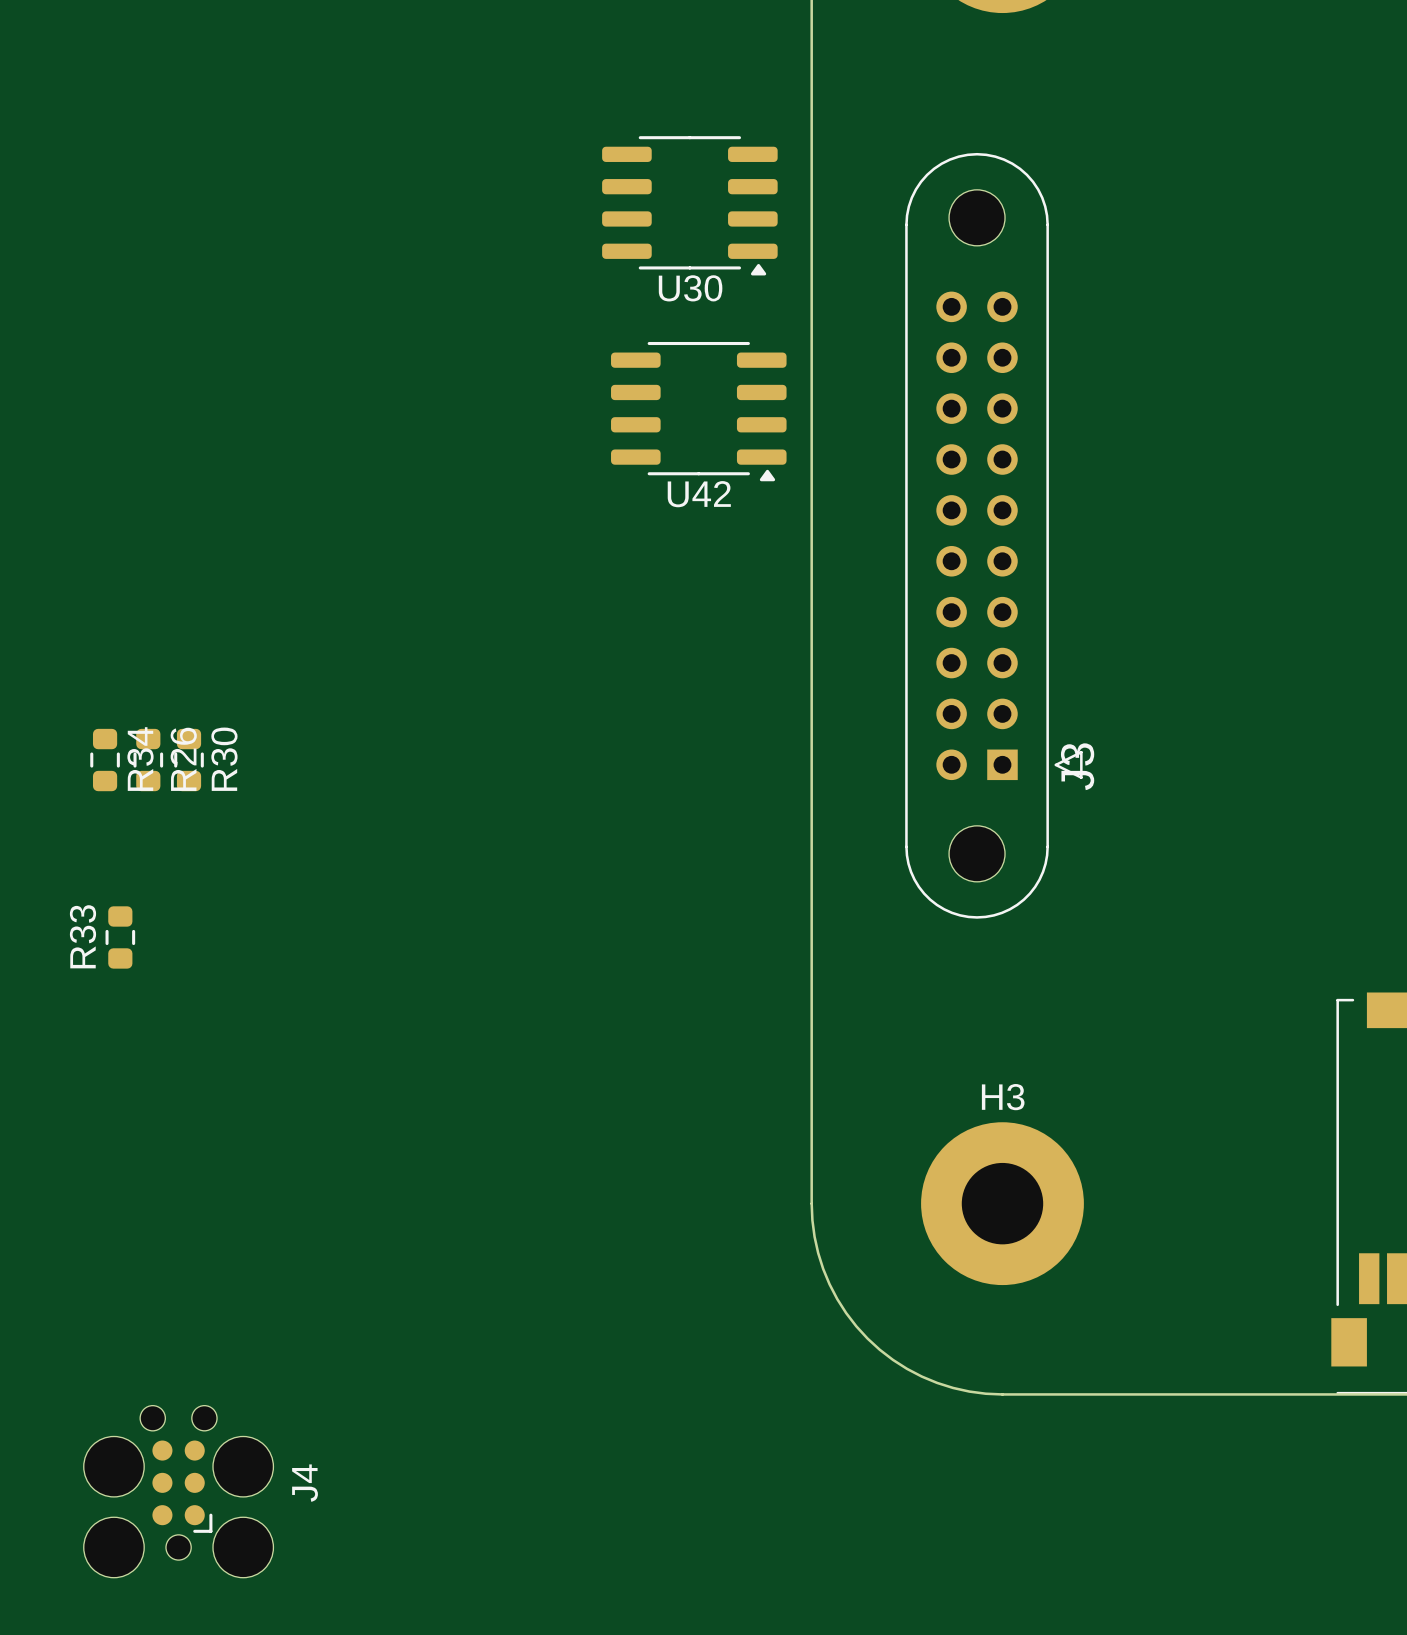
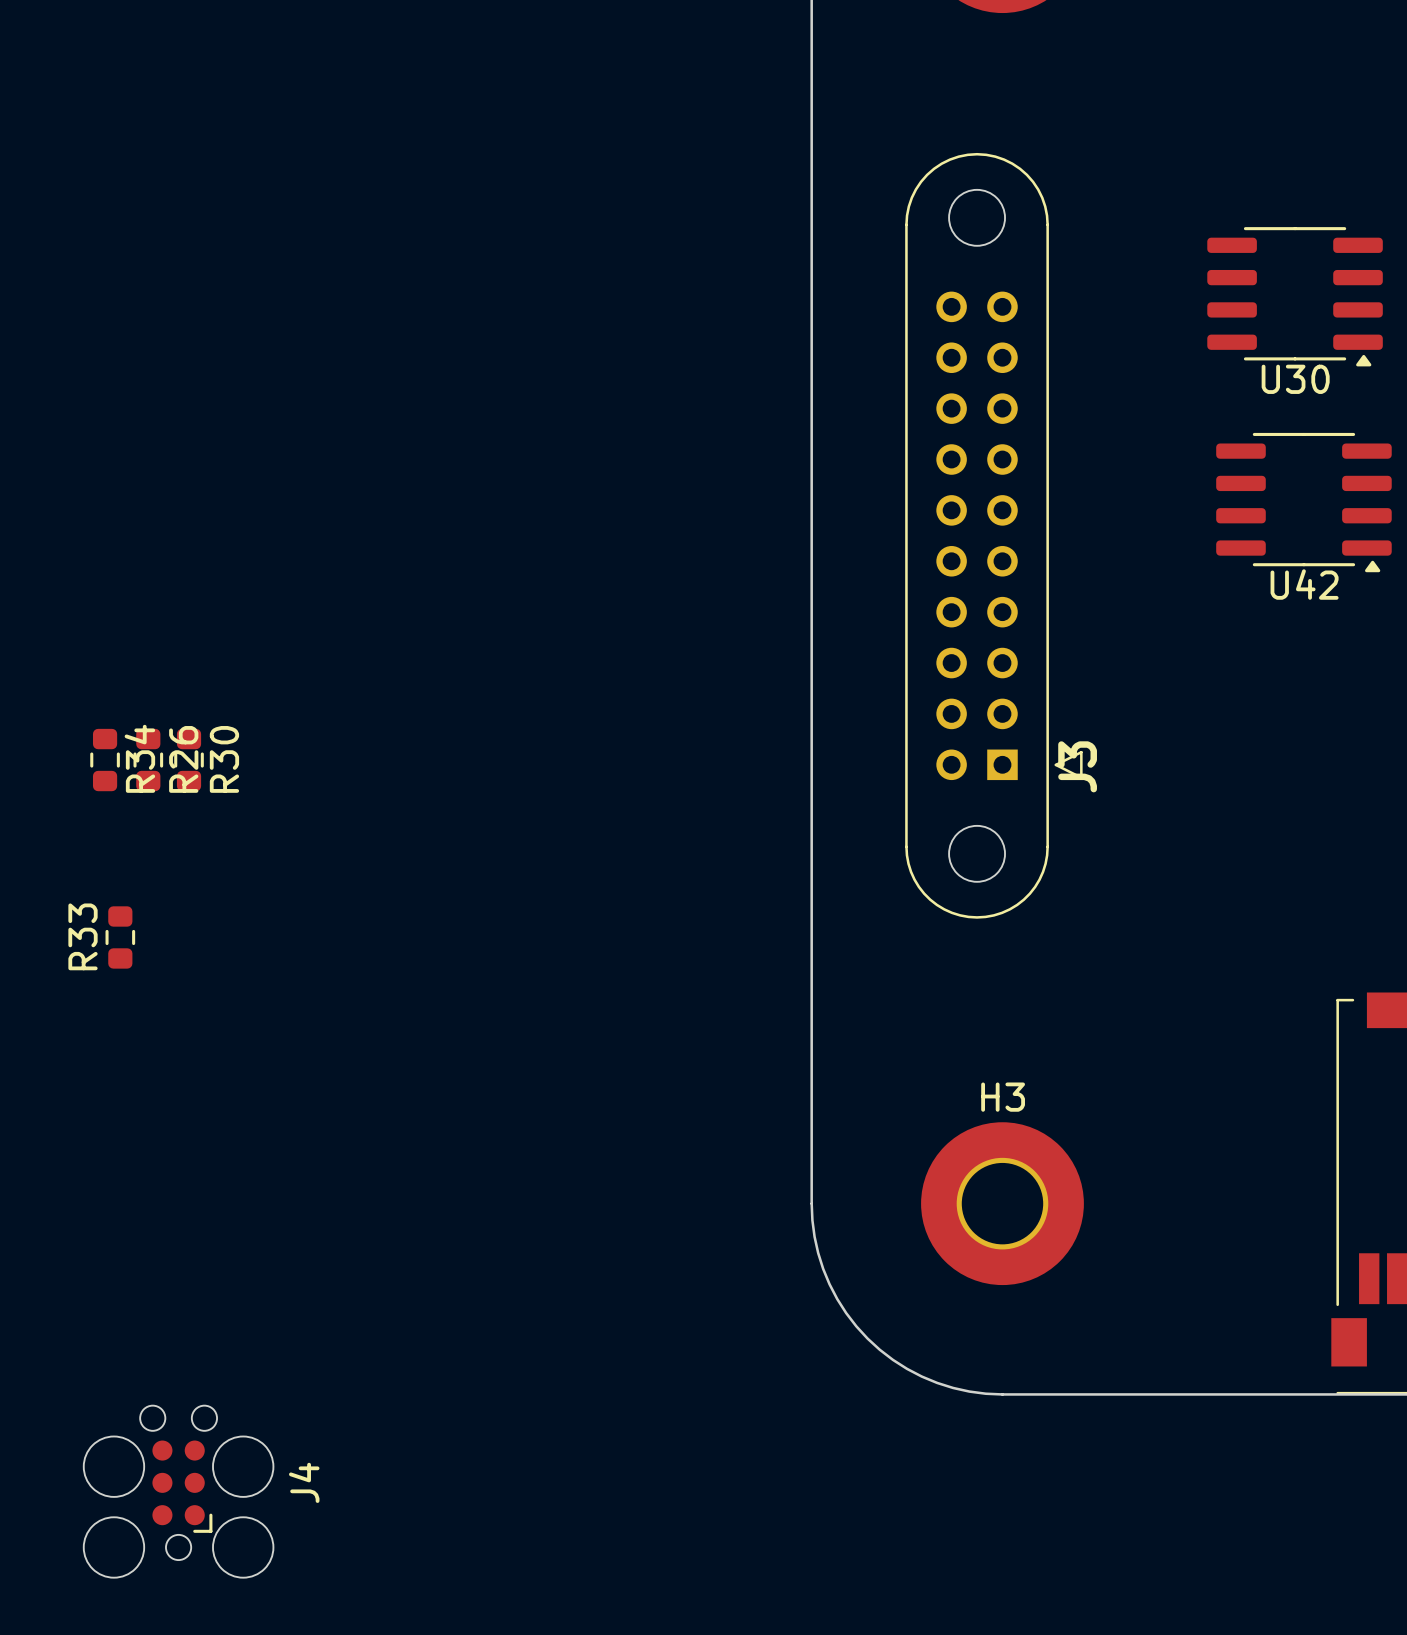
U30 position: (689, 205) -> (1295, 296)
U42 position: (698, 411) -> (1303, 502)

